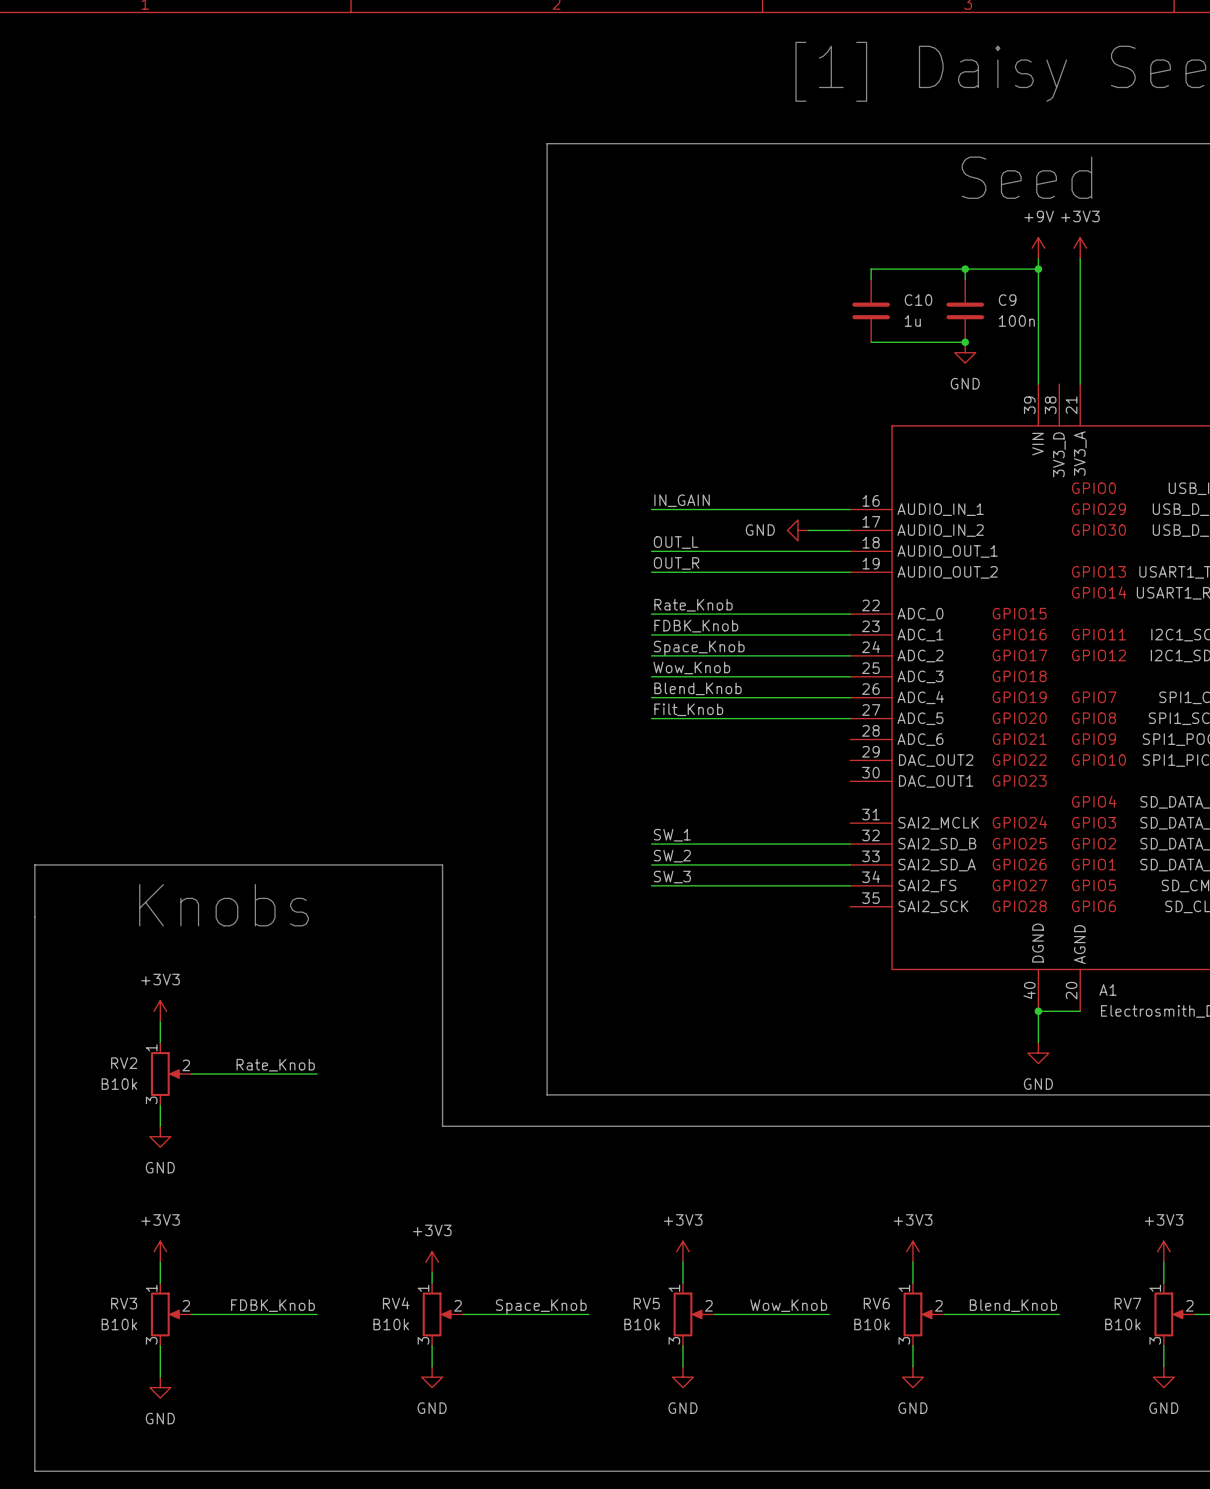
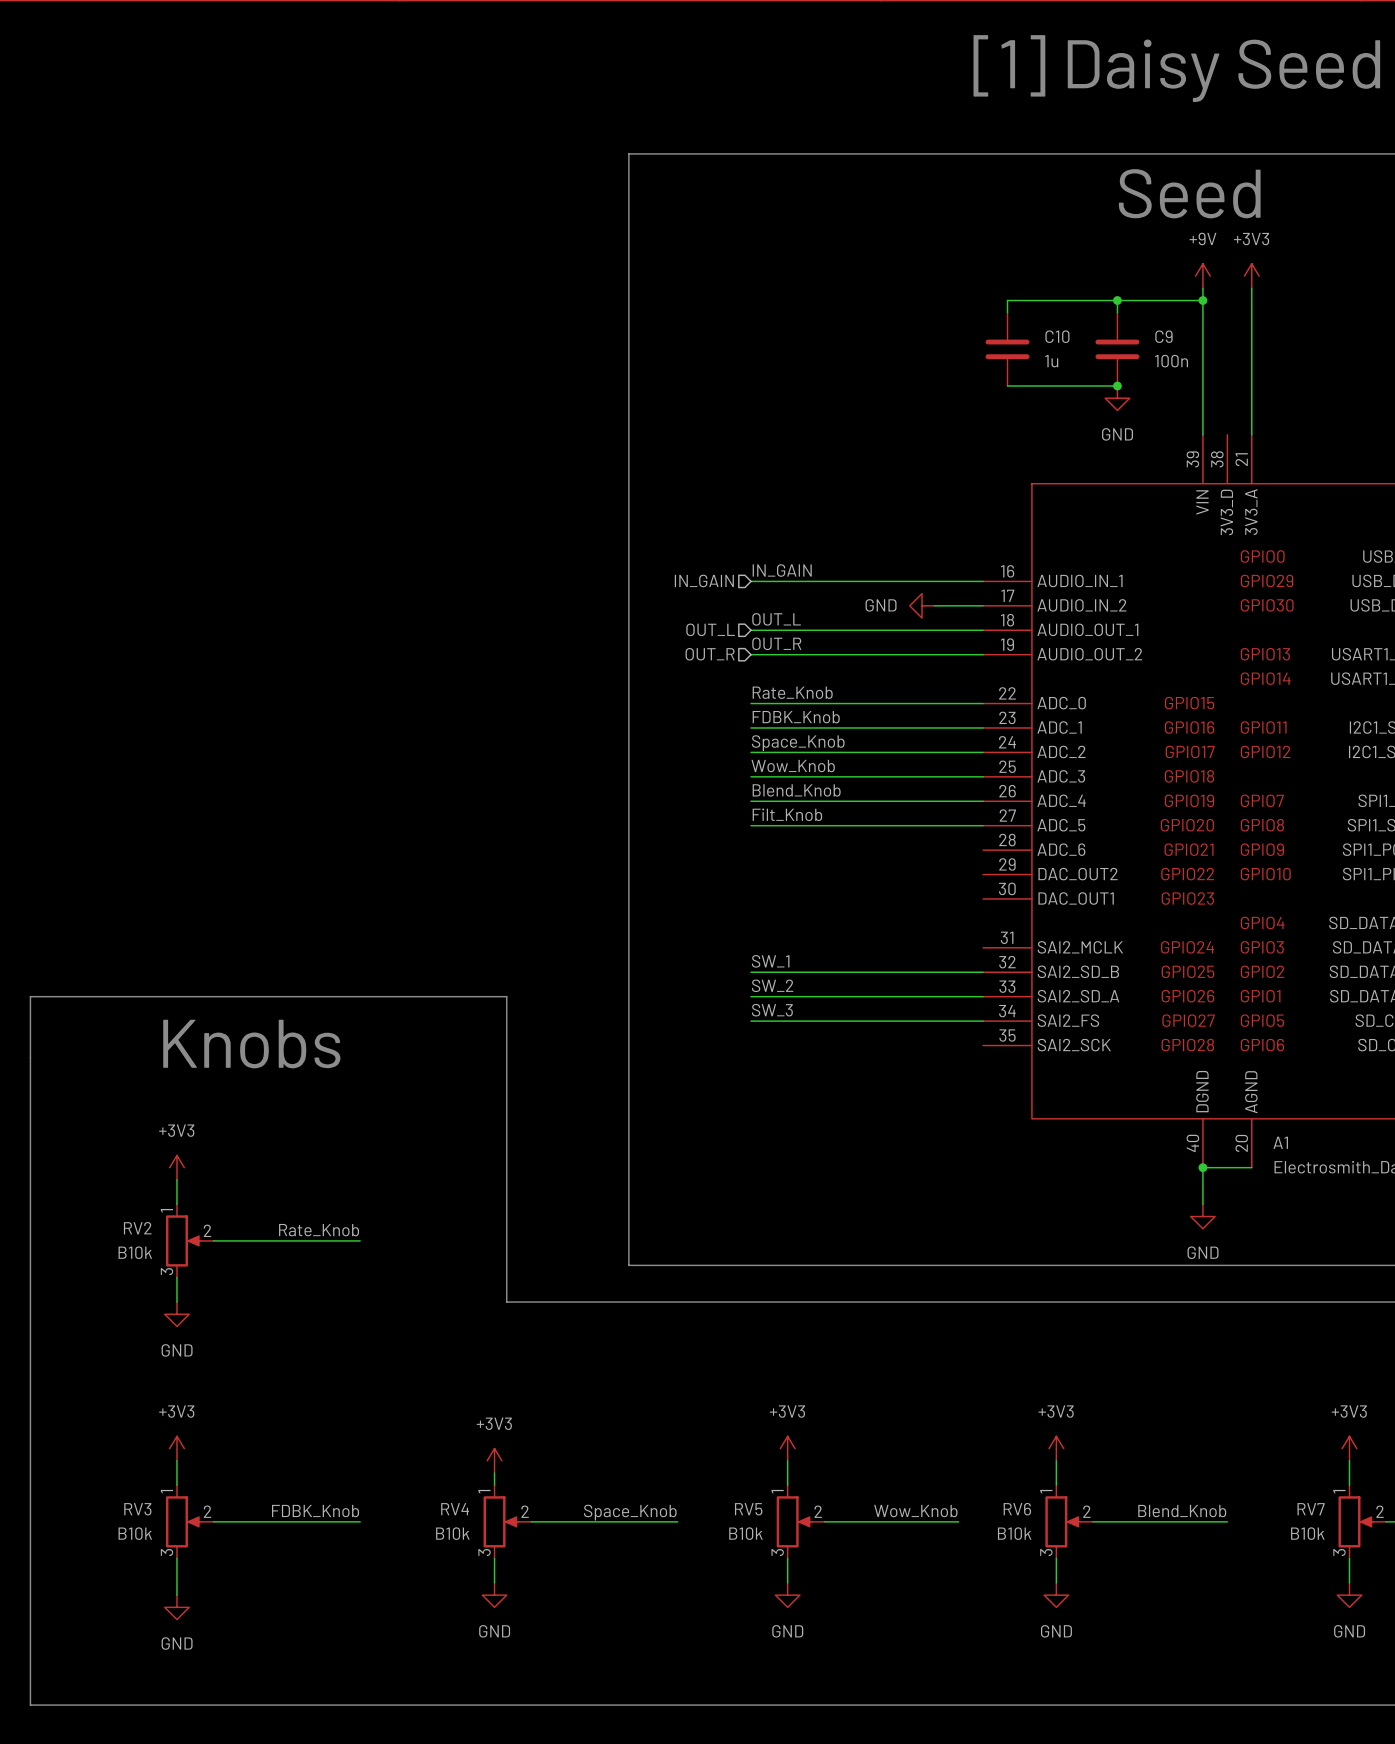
hierarchical label: none -> IN_GAIN (704, 580)
hierarchical label: none -> OUT_L (710, 629)
hierarchical label: none -> OUT_R (710, 654)

